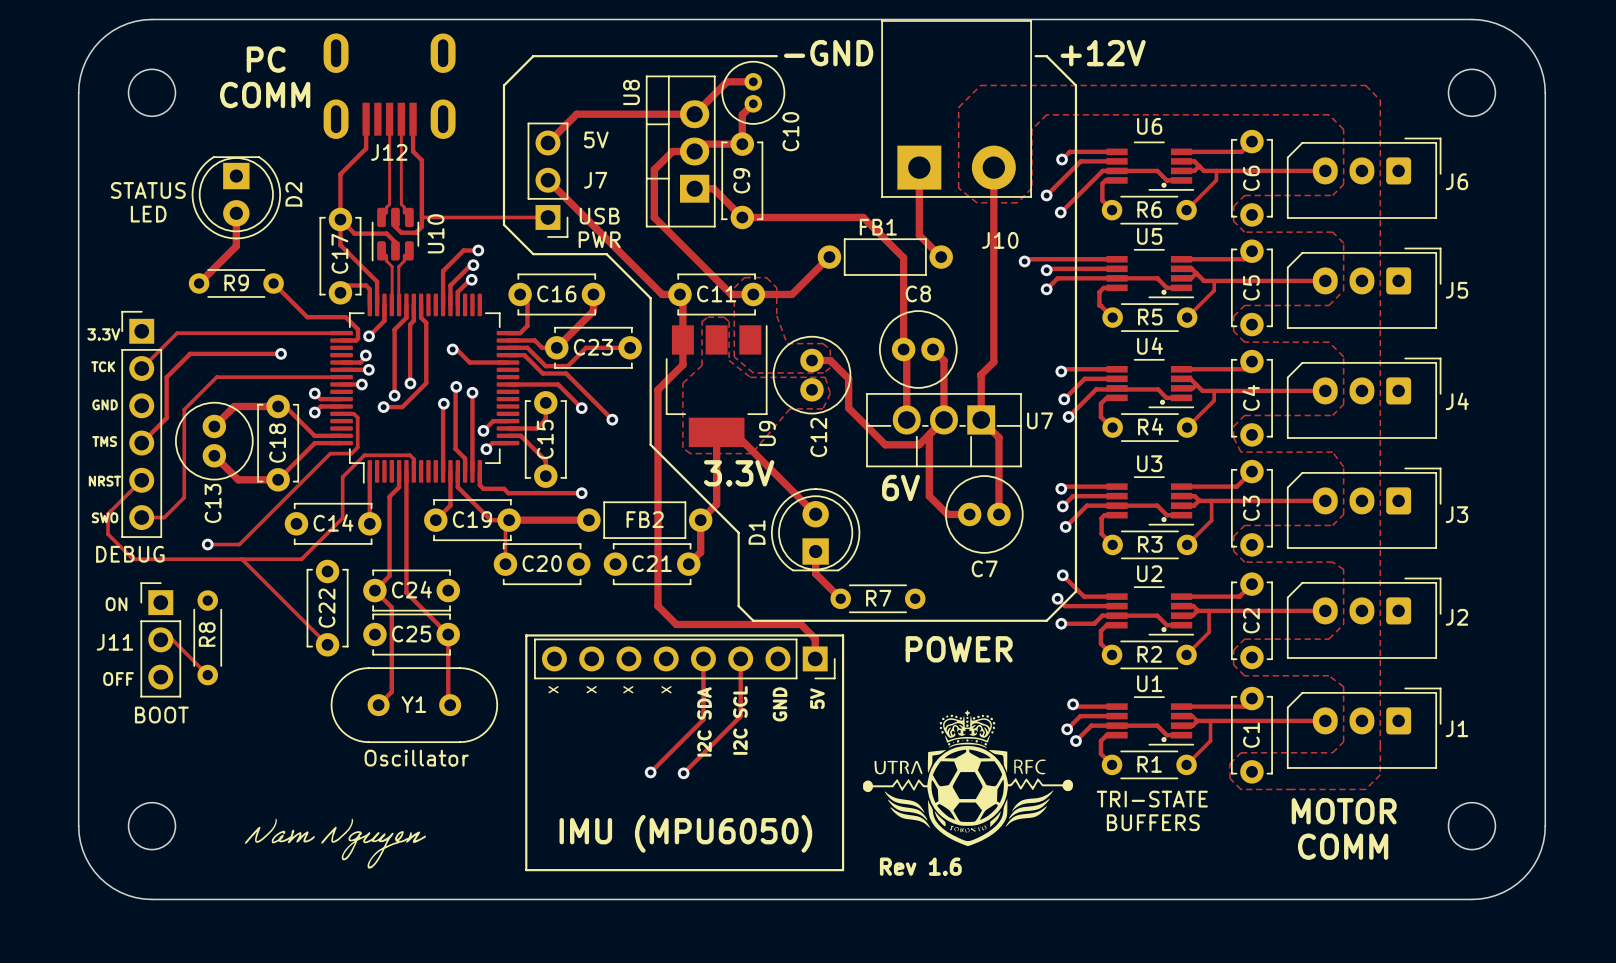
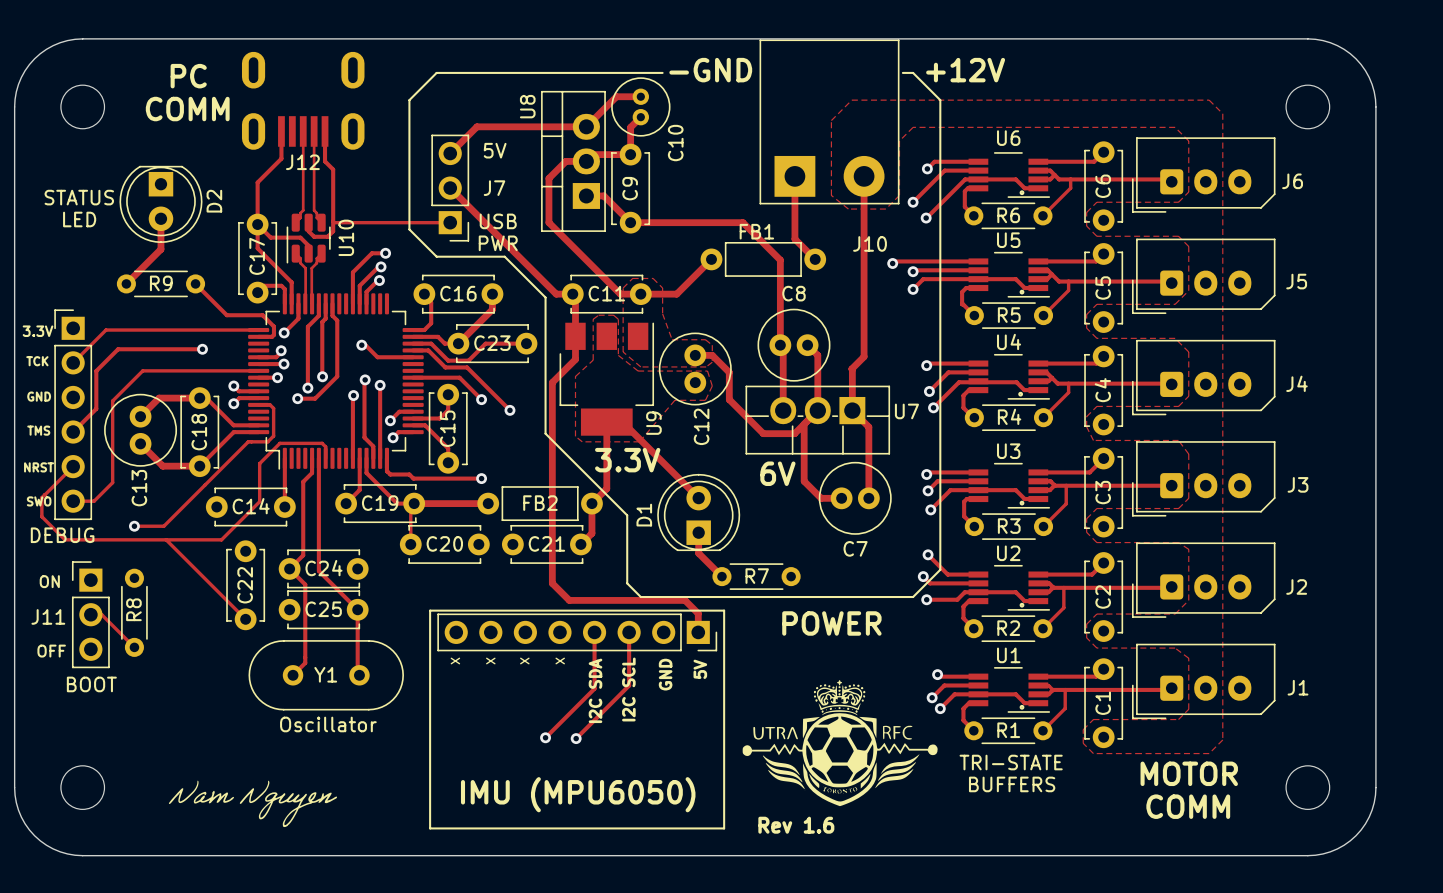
J6 rotation: 0° (1364, 178) -> 180° (1203, 175)
J5 rotation: 0° (1364, 288) -> 180° (1203, 276)
J4 rotation: 0° (1364, 398) -> 180° (1203, 377)
J3 rotation: 0° (1364, 508) -> 180° (1203, 478)
J2 rotation: 0° (1364, 618) -> 180° (1203, 580)
J1 rotation: 0° (1364, 728) -> 180° (1203, 681)

